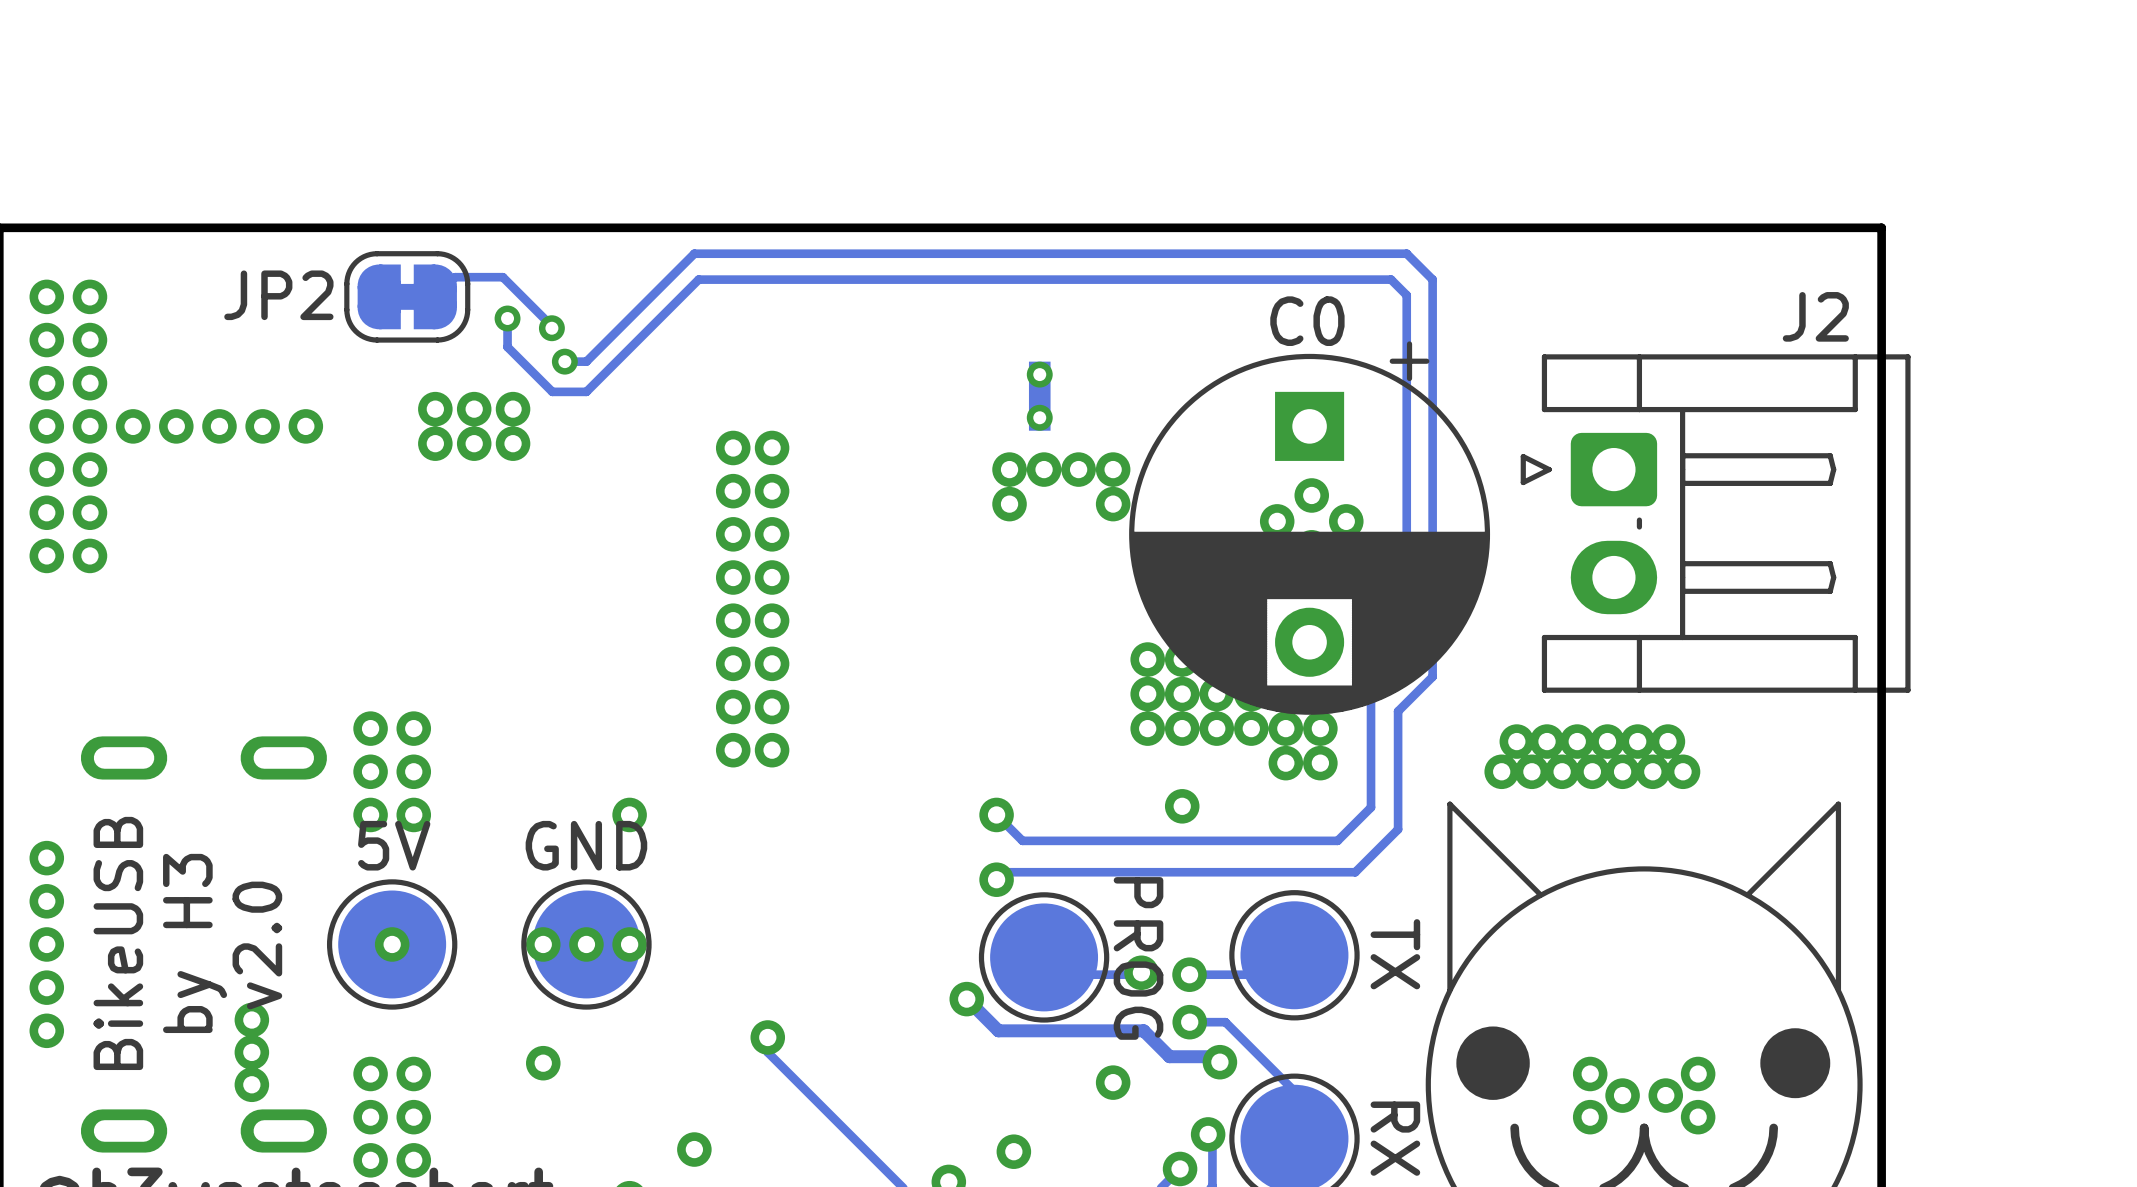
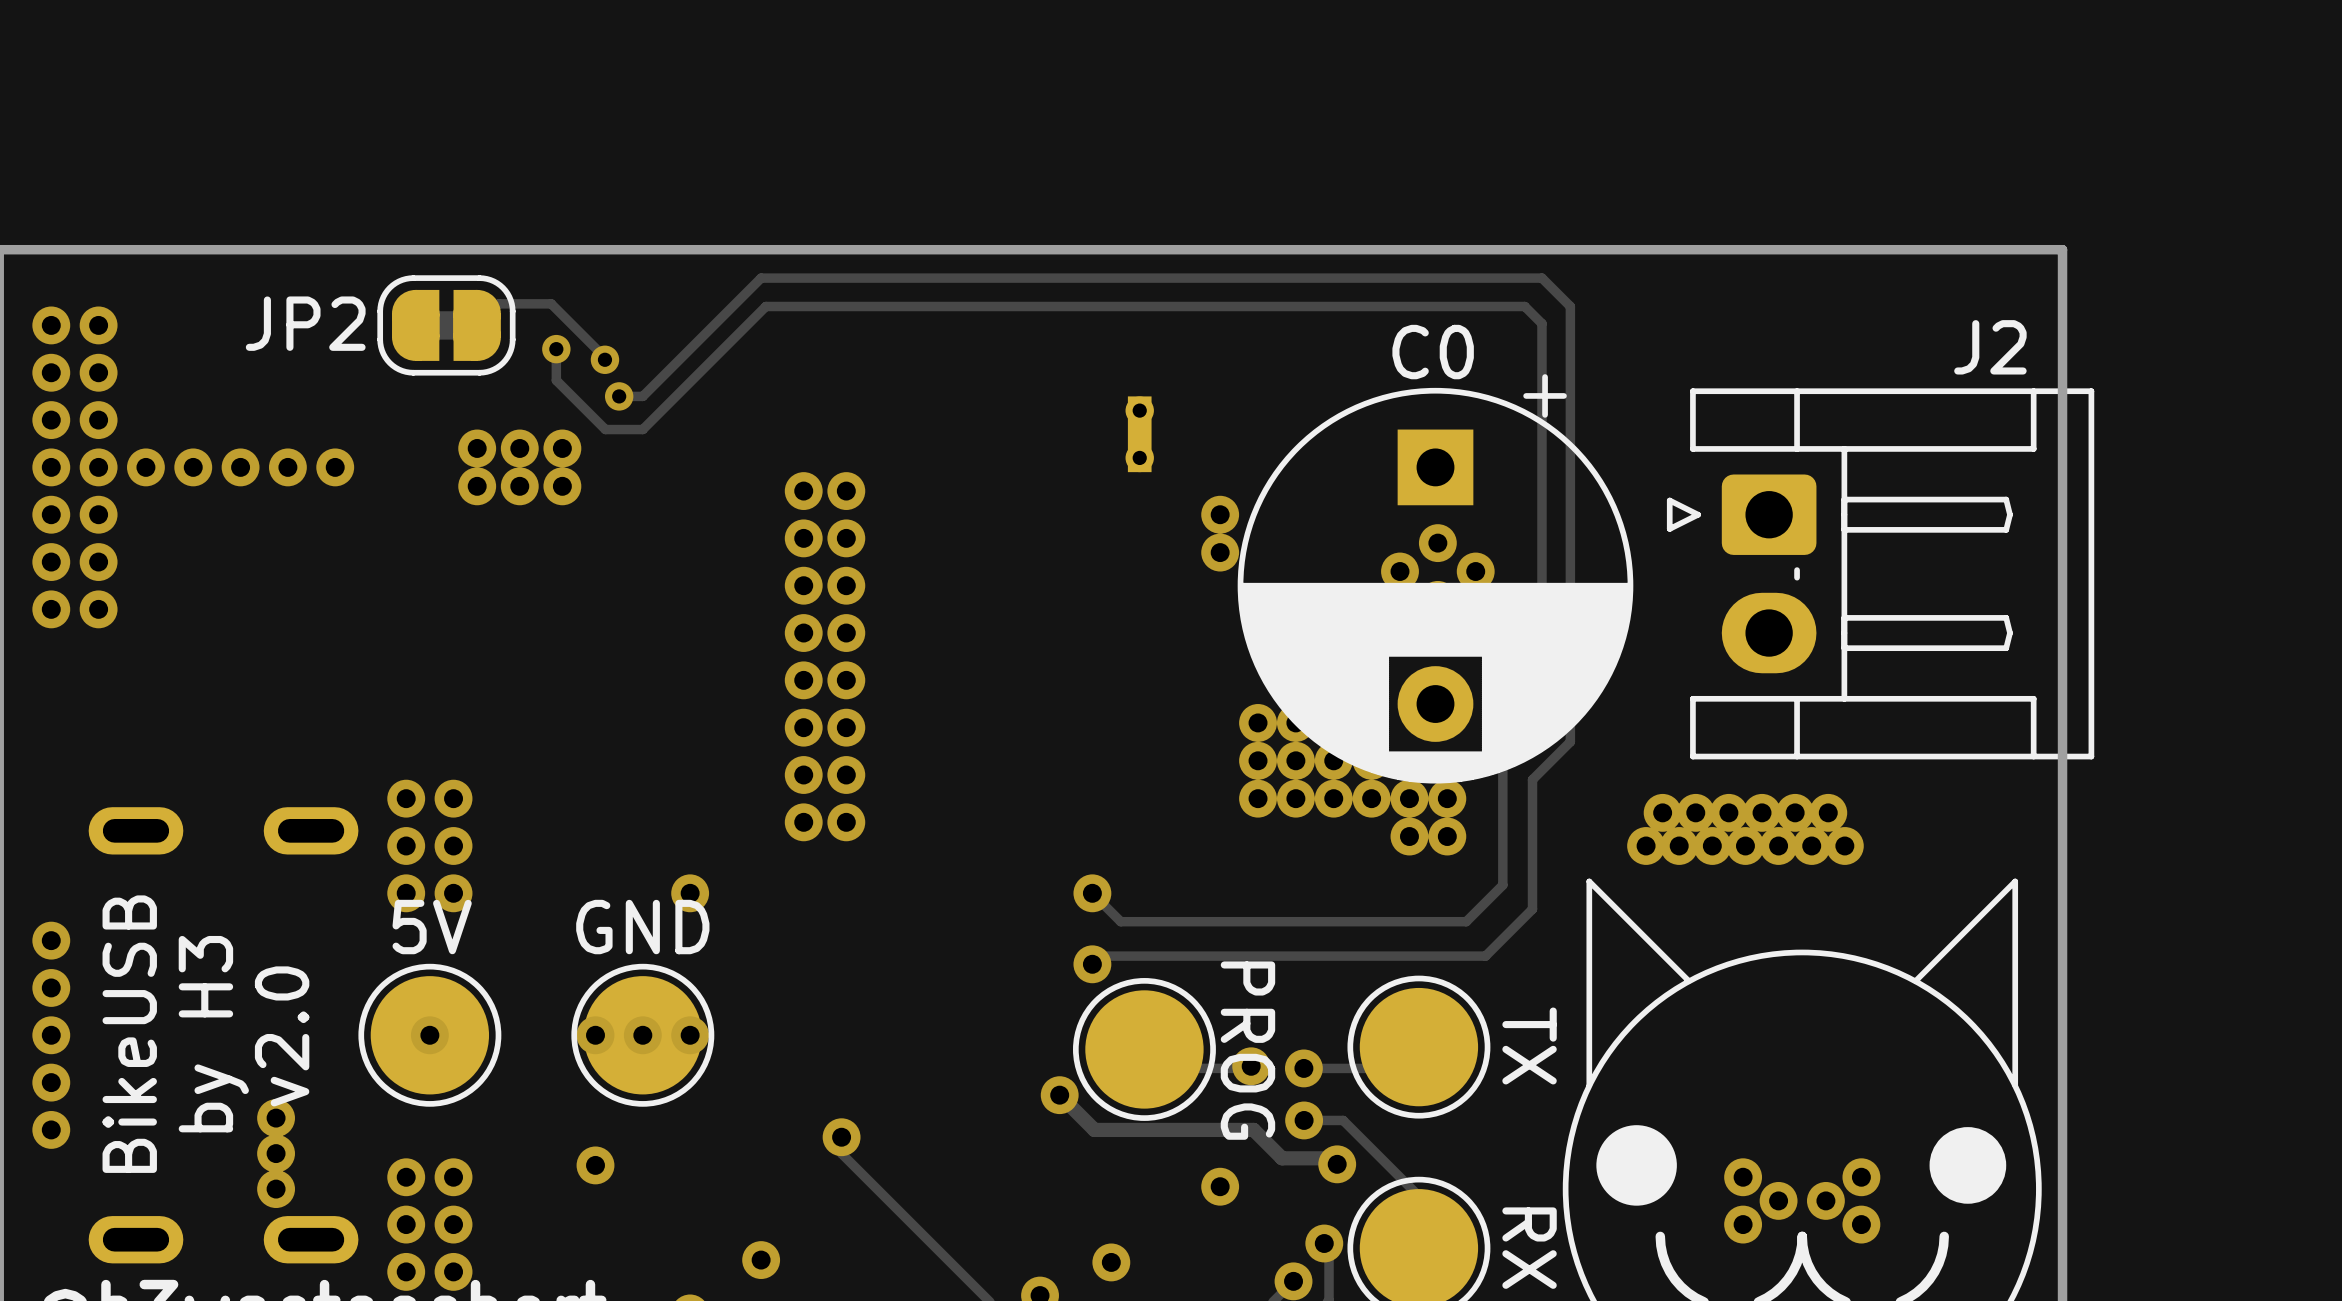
via: (1009, 469) -> none
via: (1044, 469) -> none
via: (1078, 469) -> none
via: (1009, 504) -> none
via: (1182, 806) -> none

